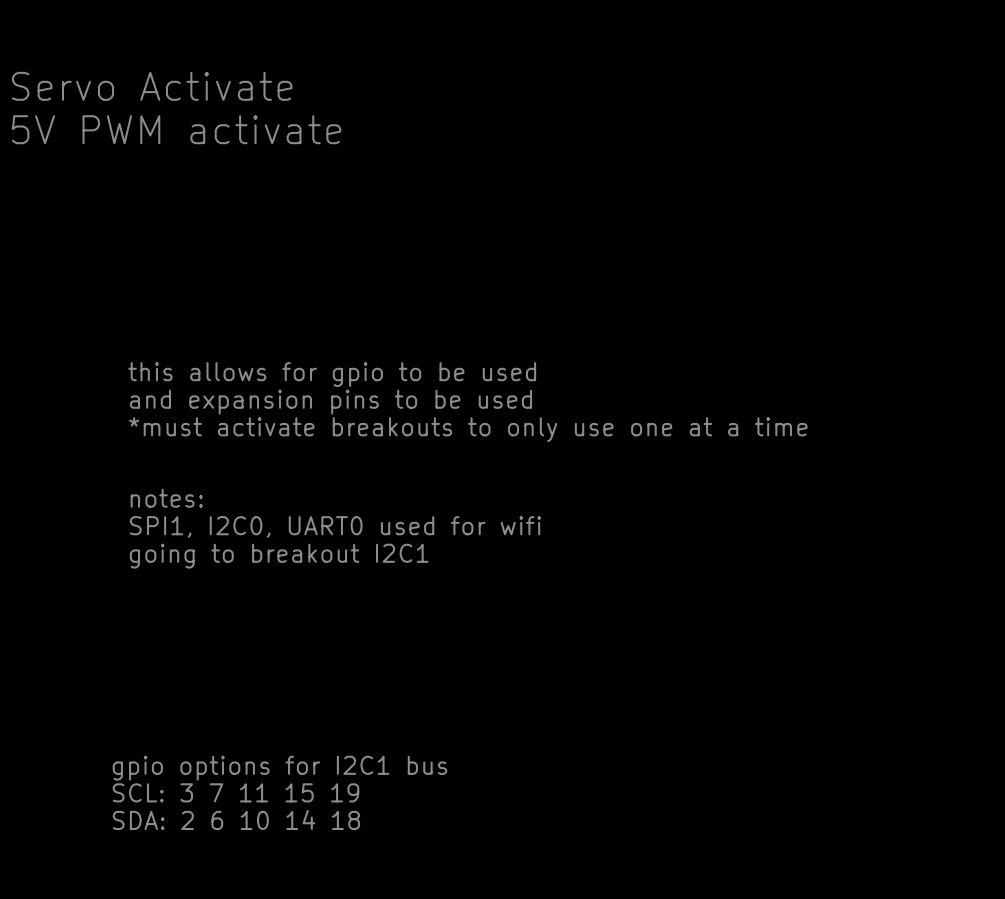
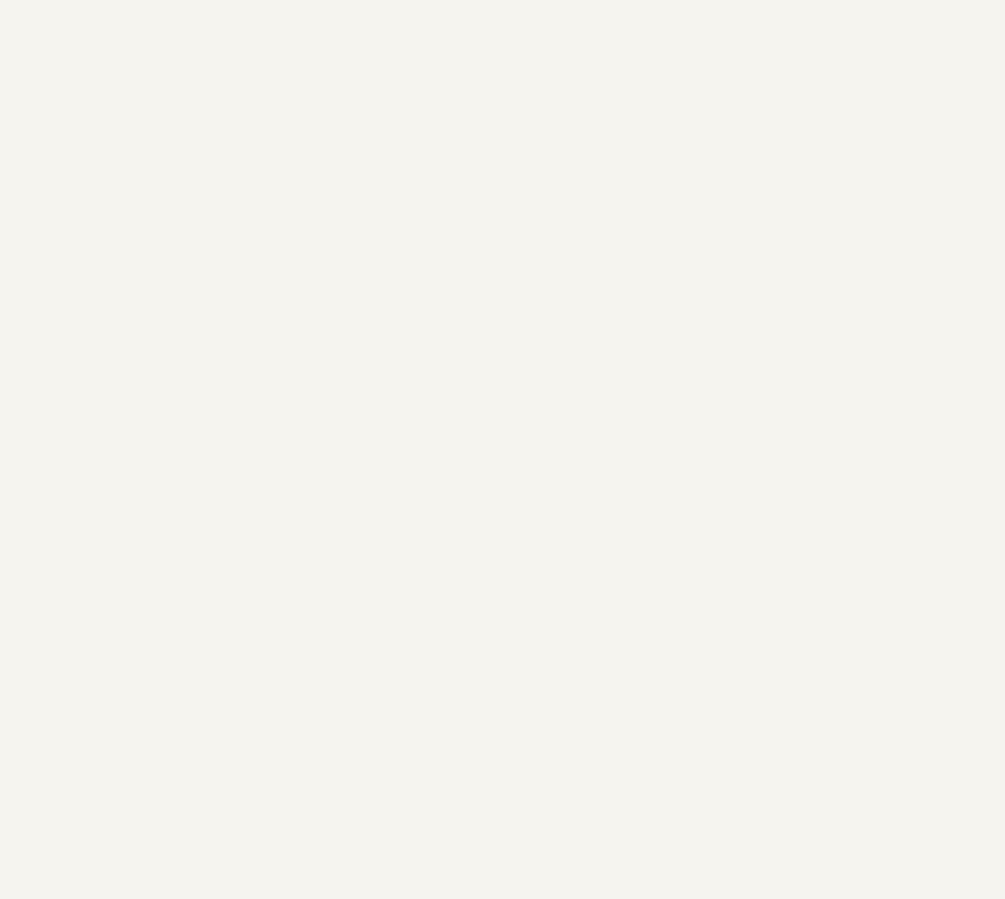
text: Servo Activate (152, 86) -> none
text: 5V PWM activate (176, 129) -> none
text: this allows for gpio to be used (332, 374) -> none
text: and expansion pins to be used (330, 402) -> none
text: *must activate breakouts to only use one at a time (468, 429) -> none
text: notes: (166, 498) -> none
text: SPI1, I2C0, UART0 used for wifi (335, 526) -> none
text: going to breakout I2C1 (279, 556) -> none
text: gpio options for I2C1 bus (280, 768) -> none
text: SCL: 3 7 11 15 19 (236, 792) -> none
text: SDA: 2 6 10 14 18 (236, 820) -> none

